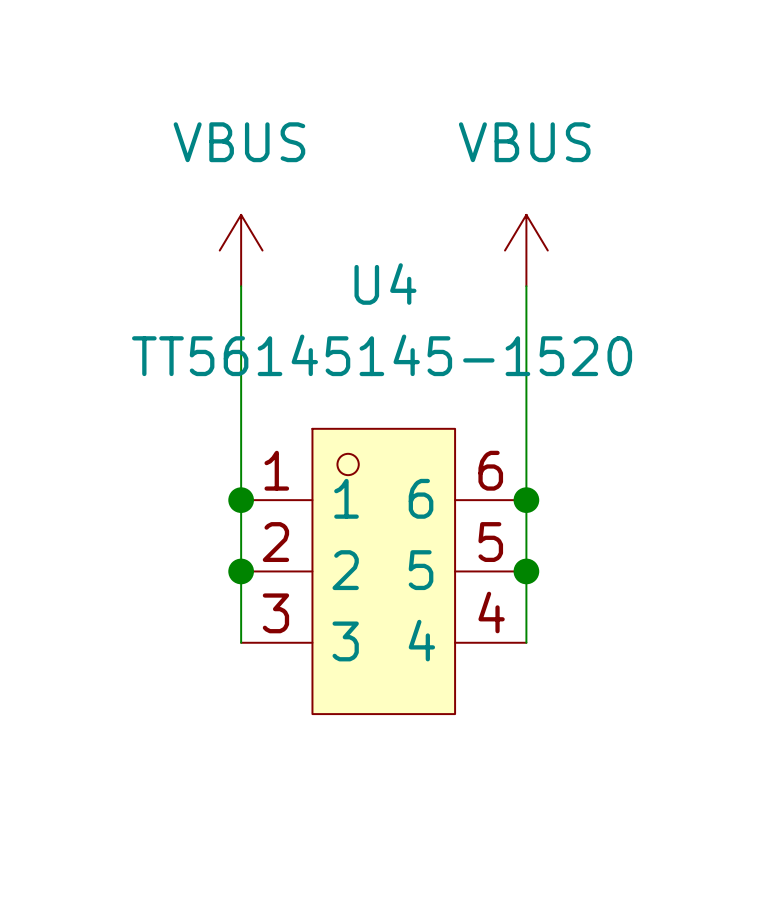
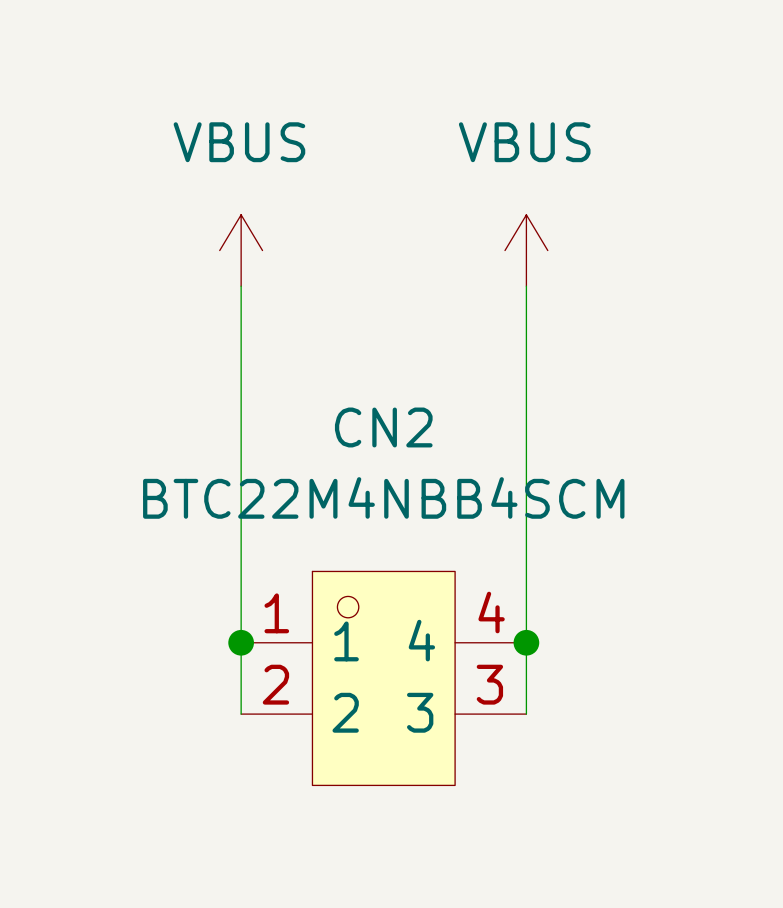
junction: (241, 500) -> none
junction: (526, 500) -> none
junction: (241, 571) -> none
U4: TT56145145-1520 (383, 571) -> none
junction: (526, 571) -> none
wire: none -> (241, 642) (241, 714)
junction: none -> (241, 642)
wire: none -> (526, 642) (526, 714)
junction: none -> (526, 642)
CN2: none -> BTC22M4NBB4SCM (383, 678)

